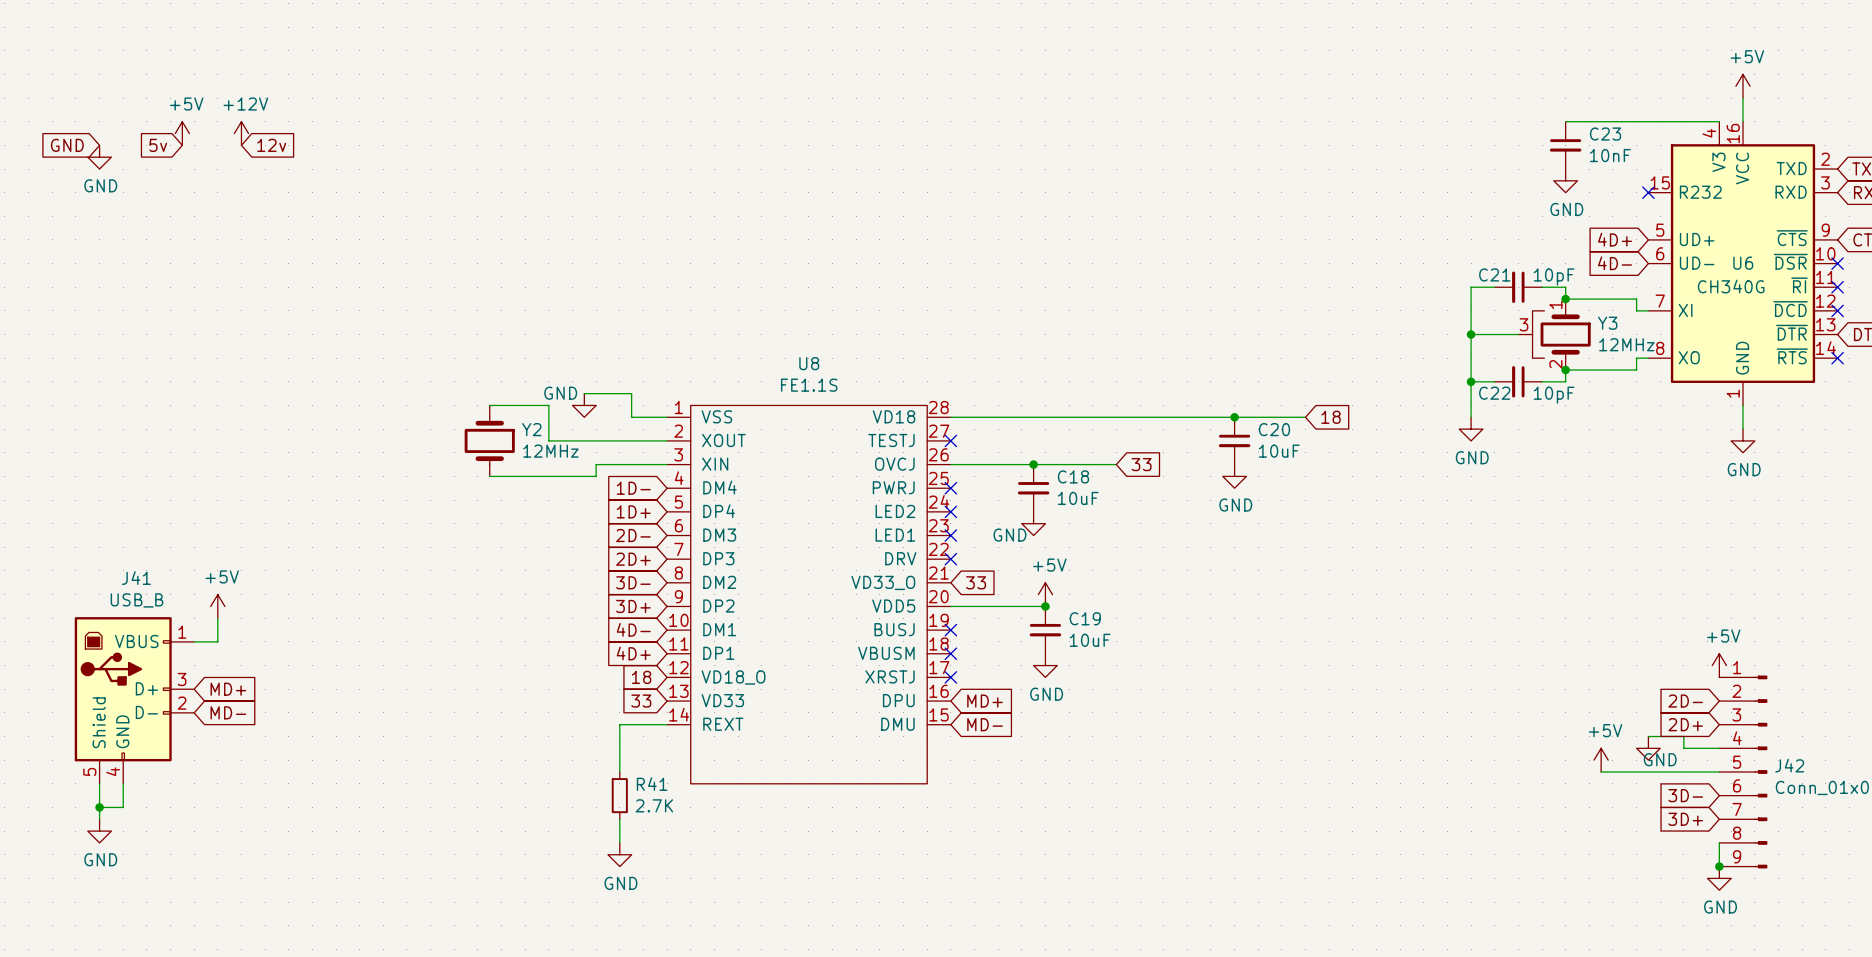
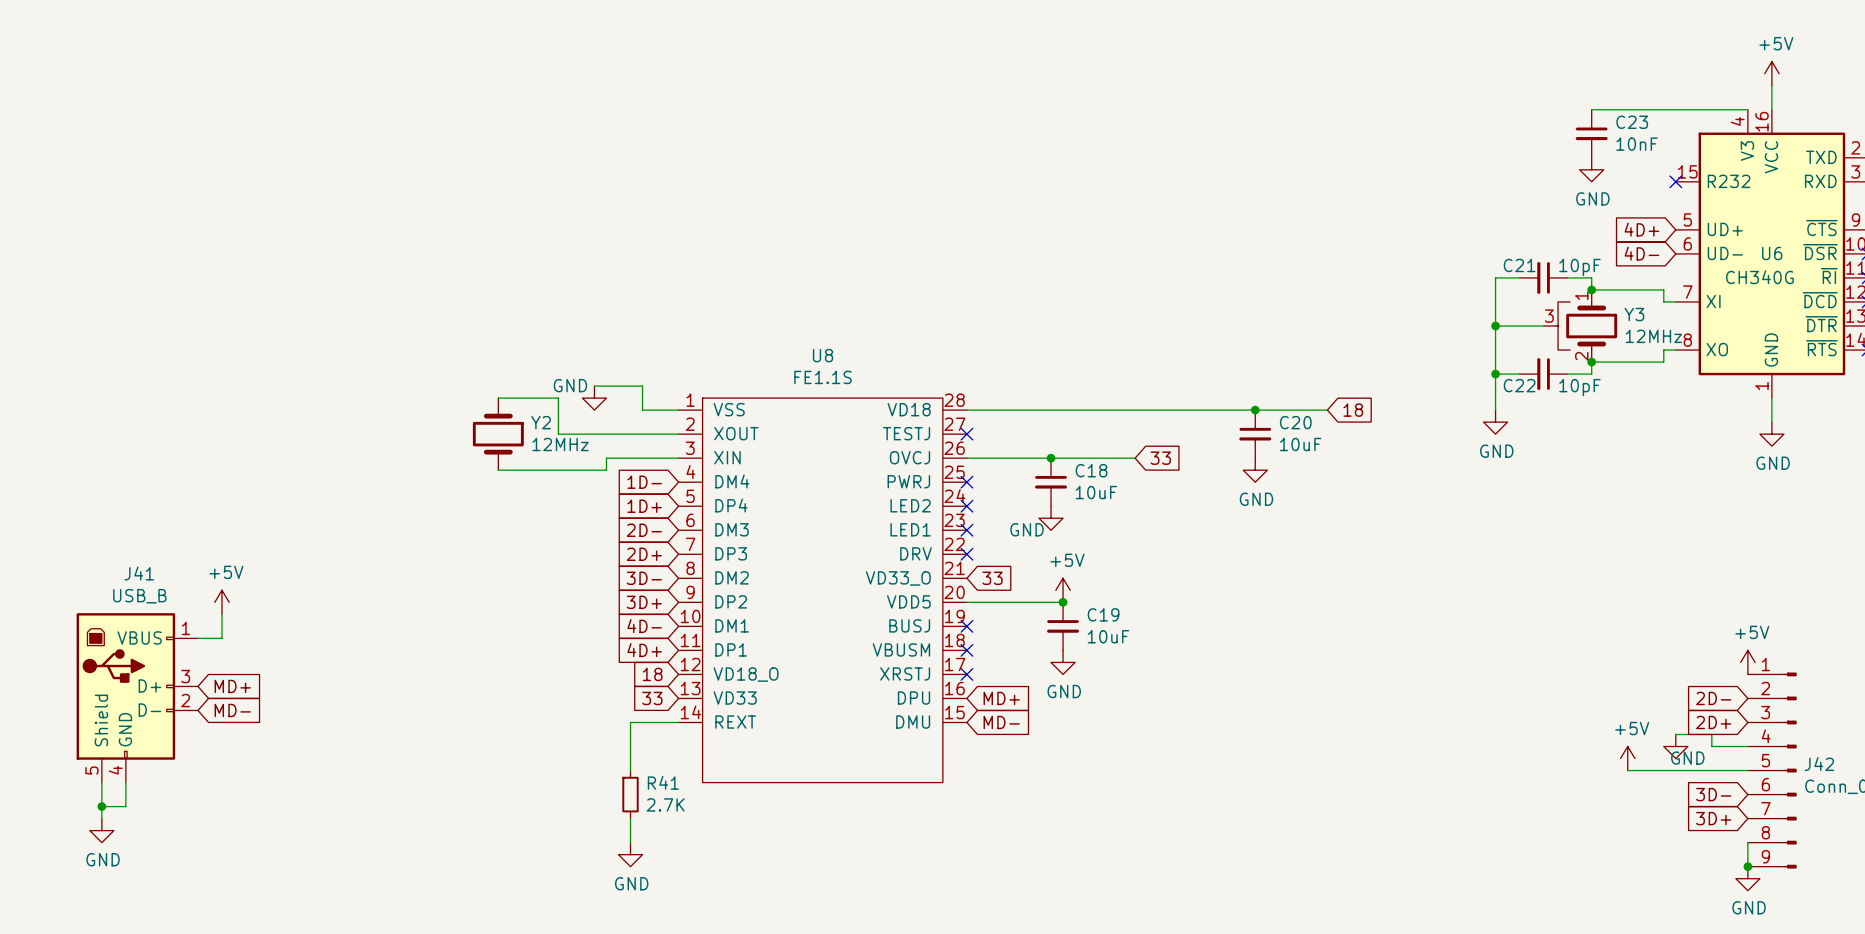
power symbol: +5V (182, 133) -> none
power symbol: +12V (241, 133) -> none
global label: GND (67, 145) -> none
global label: 5v (158, 145) -> none
global label: 12v (271, 145) -> none
power symbol: GND (99, 157) -> none

